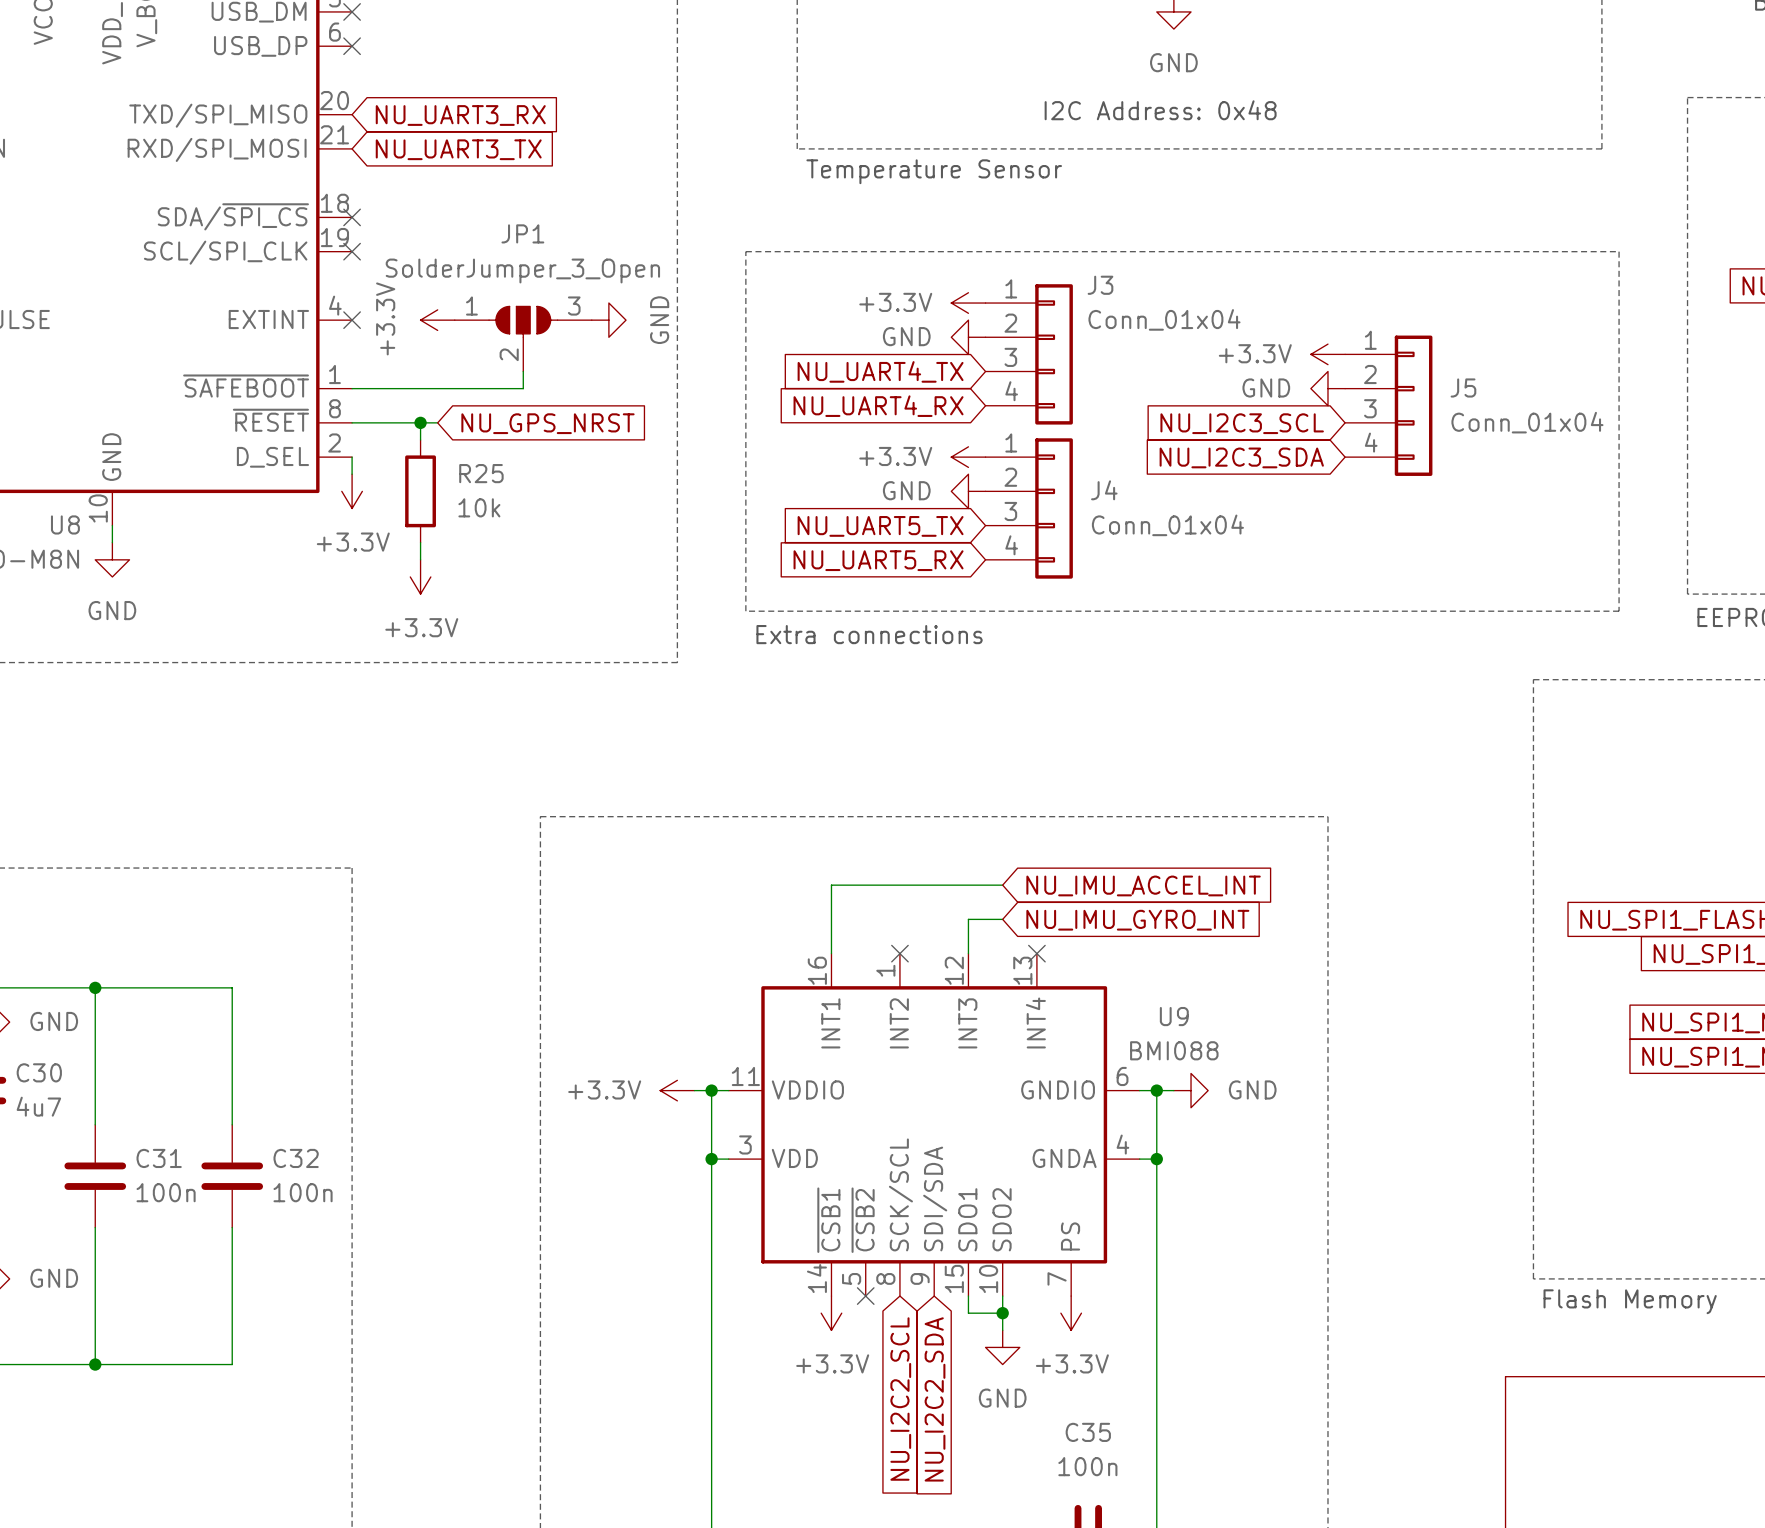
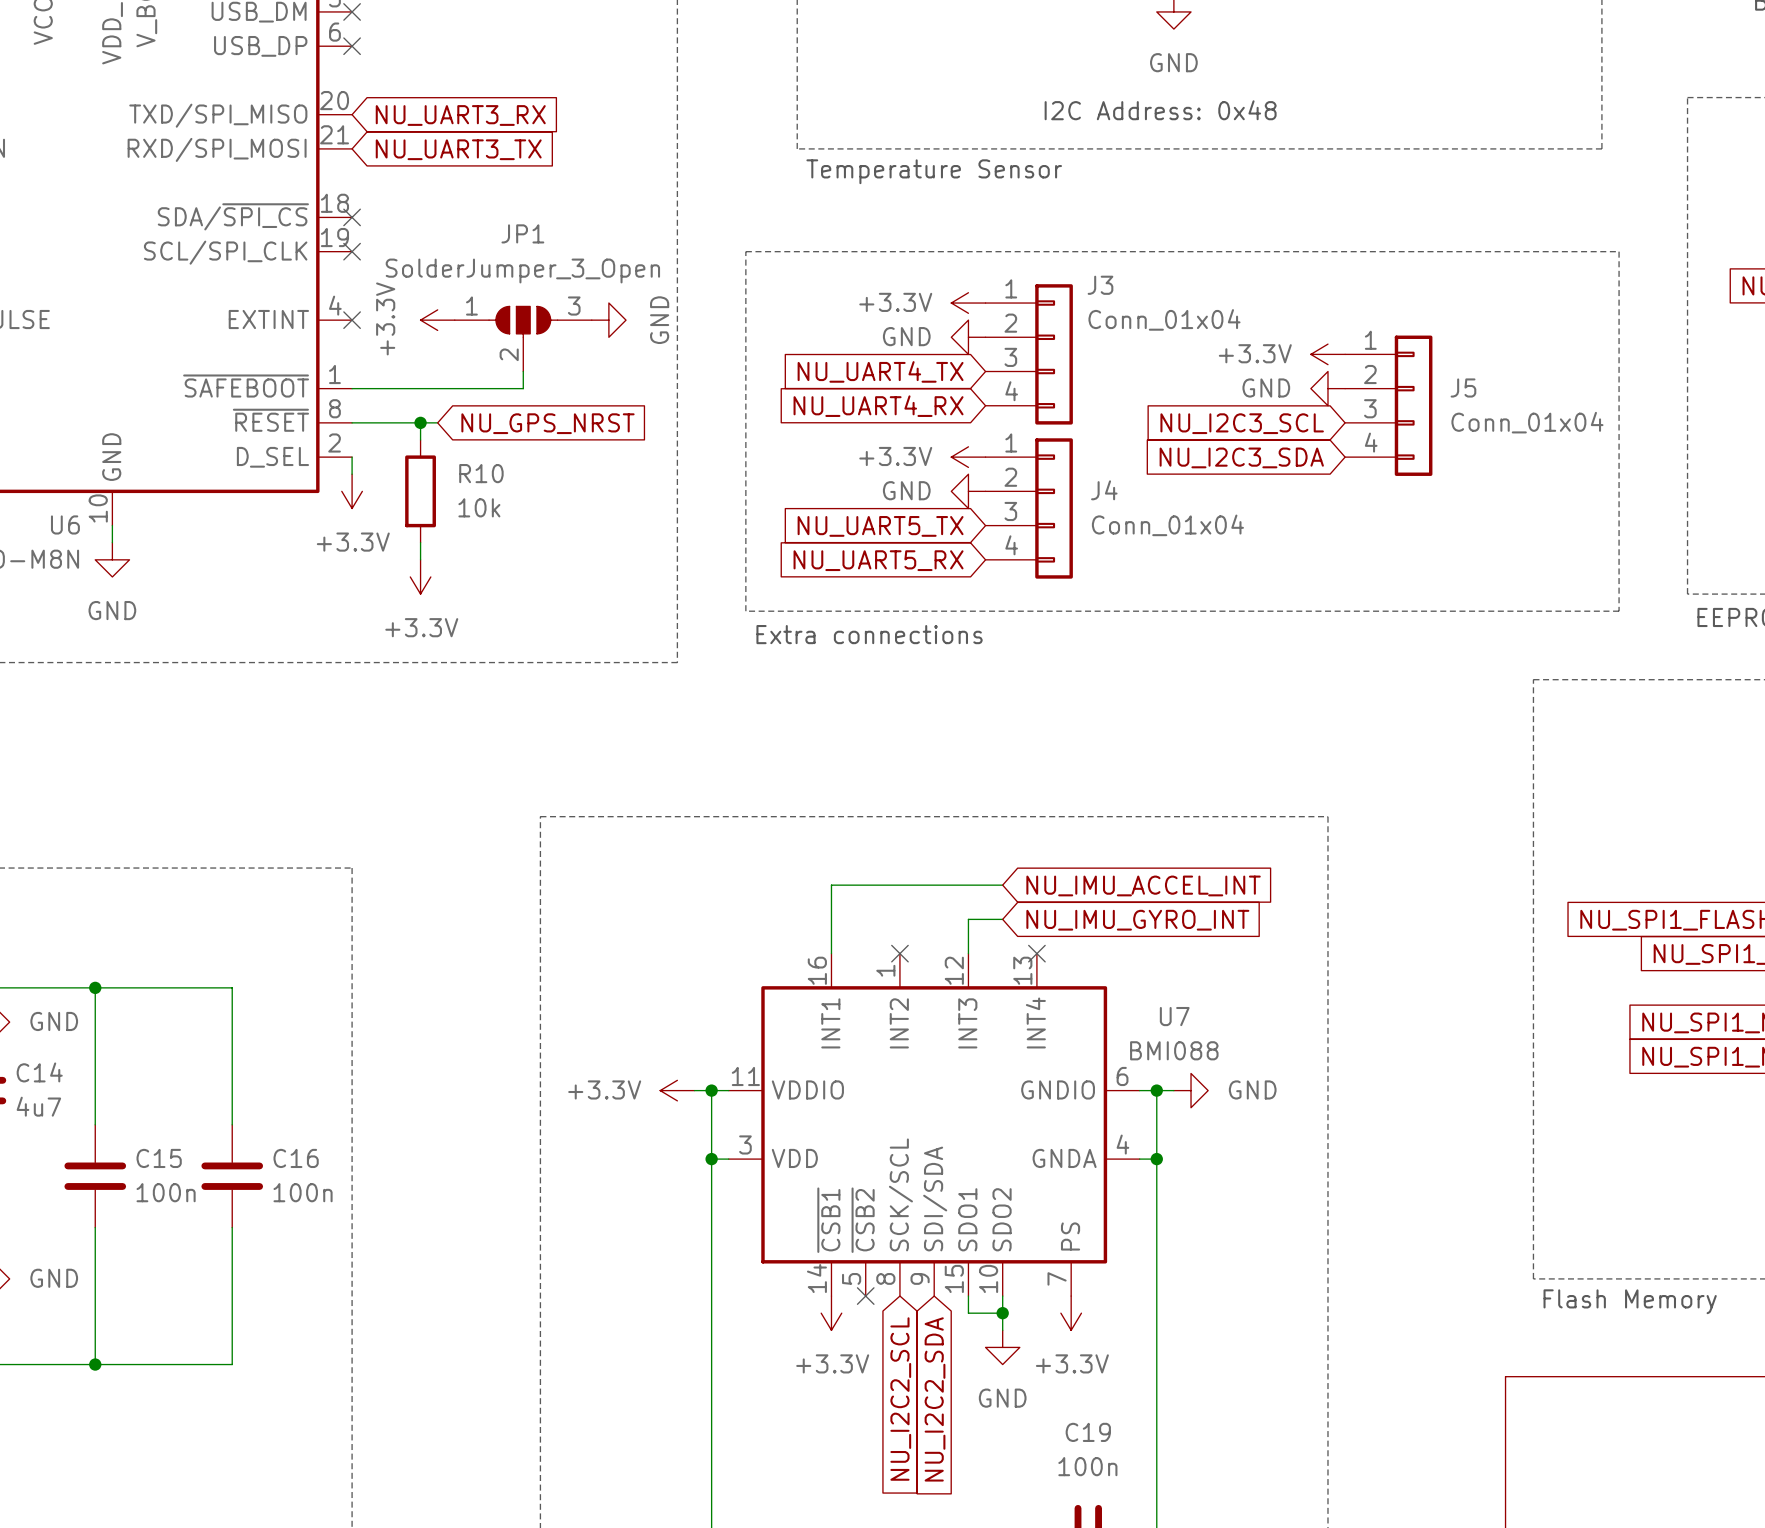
R25 name: R25 (481, 473) -> R10 (481, 473)
U8 name: U8 (65, 524) -> U6 (65, 524)
U9 name: U9 (1174, 1016) -> U7 (1174, 1016)
C30 name: C30 (39, 1072) -> C14 (39, 1072)
C31 name: C31 (159, 1158) -> C15 (159, 1158)
C32 name: C32 (296, 1158) -> C16 (296, 1158)
C35 name: C35 (1088, 1432) -> C19 (1088, 1432)

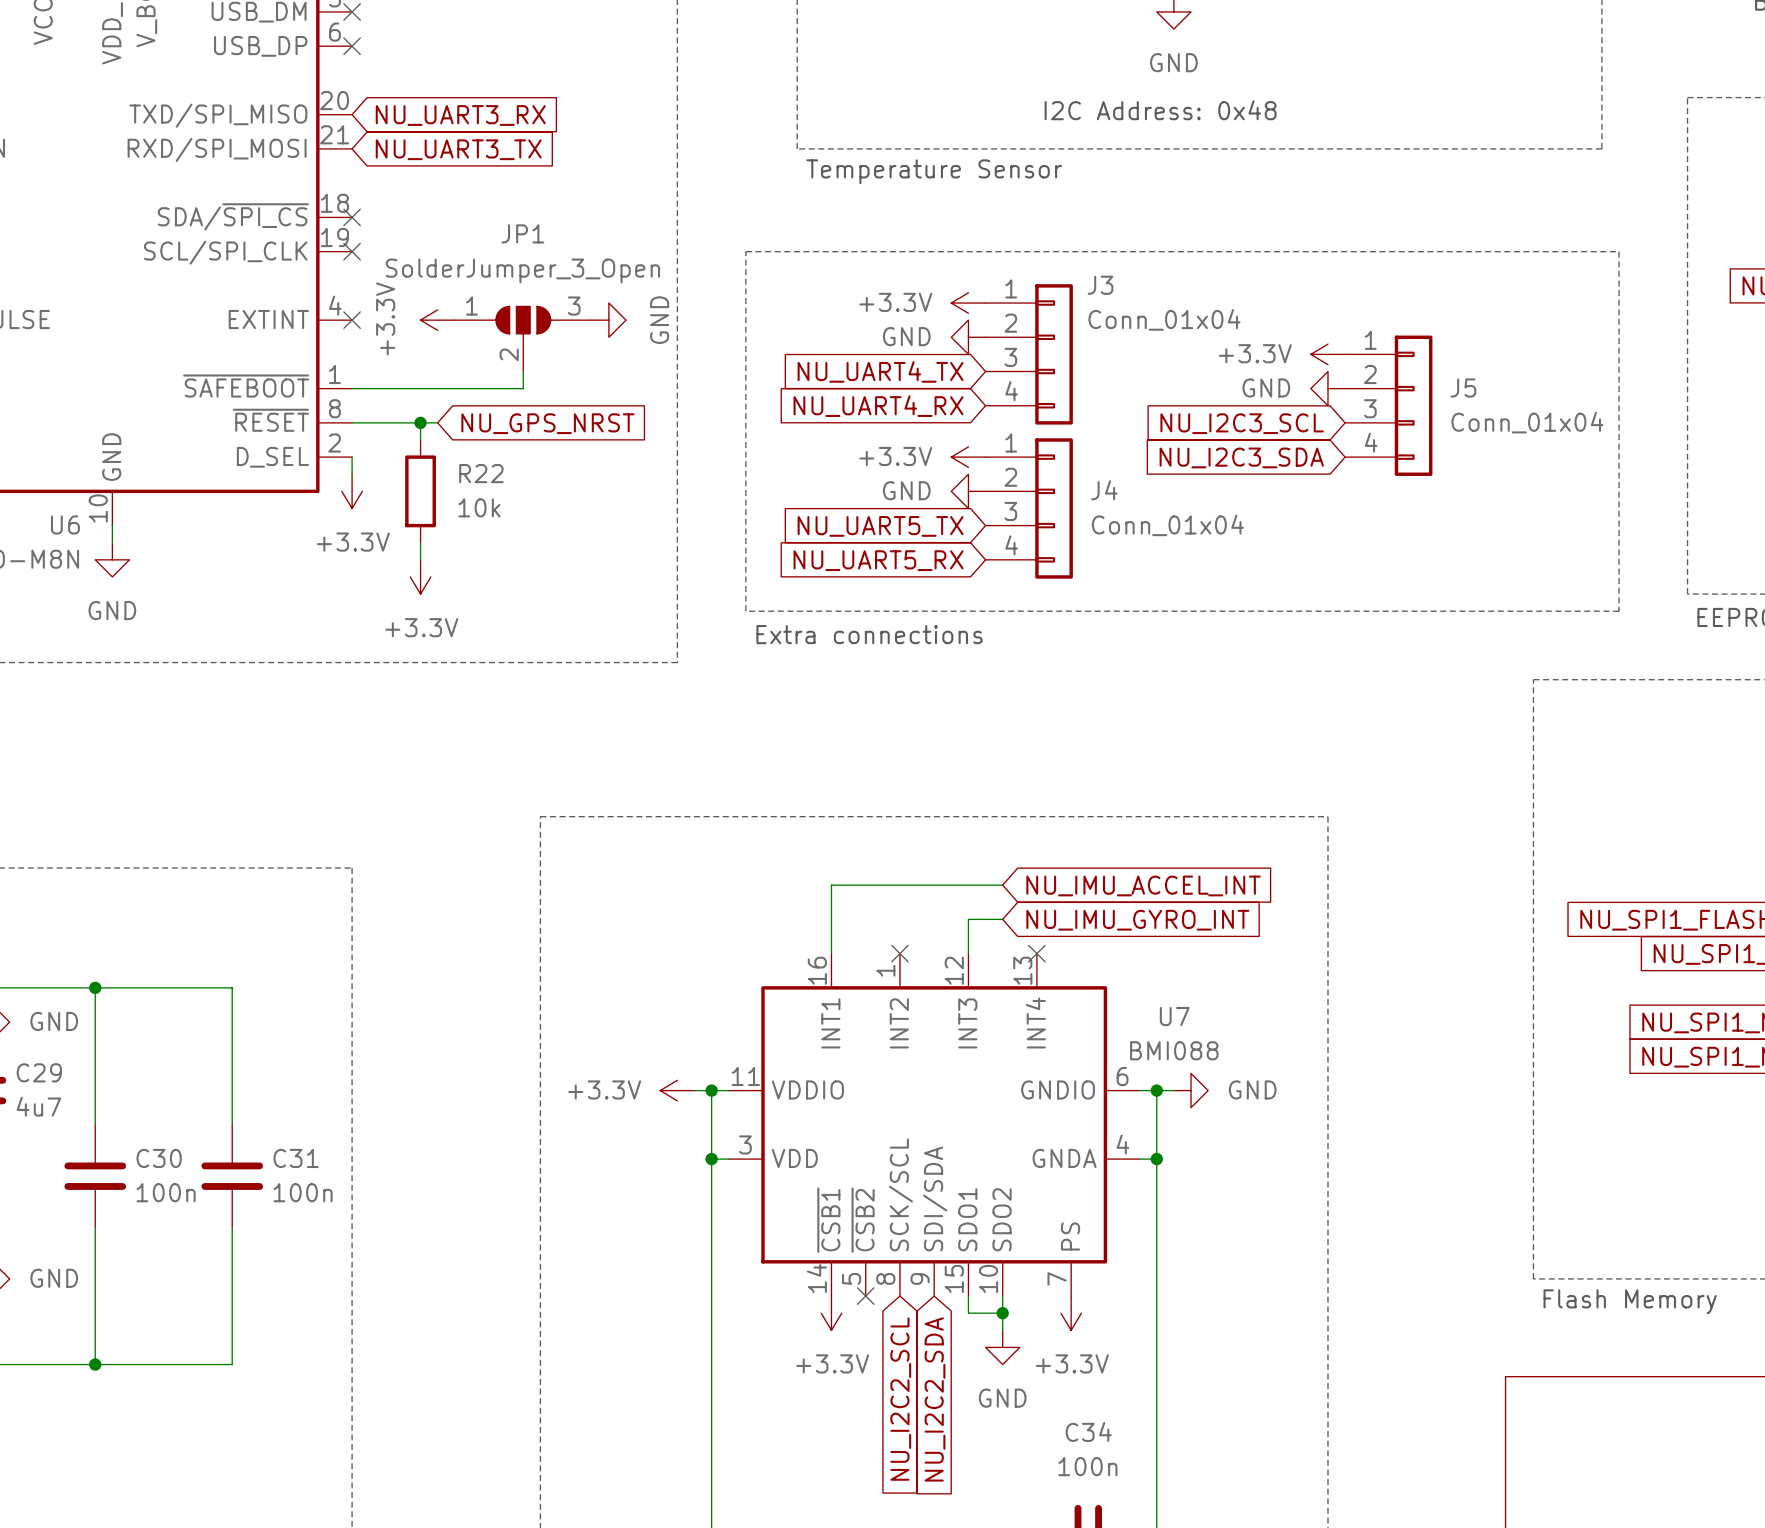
R10 name: R10 (481, 473) -> R22 (481, 473)
C14 name: C14 (39, 1072) -> C29 (39, 1072)
C15 name: C15 (159, 1158) -> C30 (159, 1158)
C16 name: C16 (296, 1158) -> C31 (296, 1158)
C19 name: C19 (1088, 1432) -> C34 (1088, 1431)

